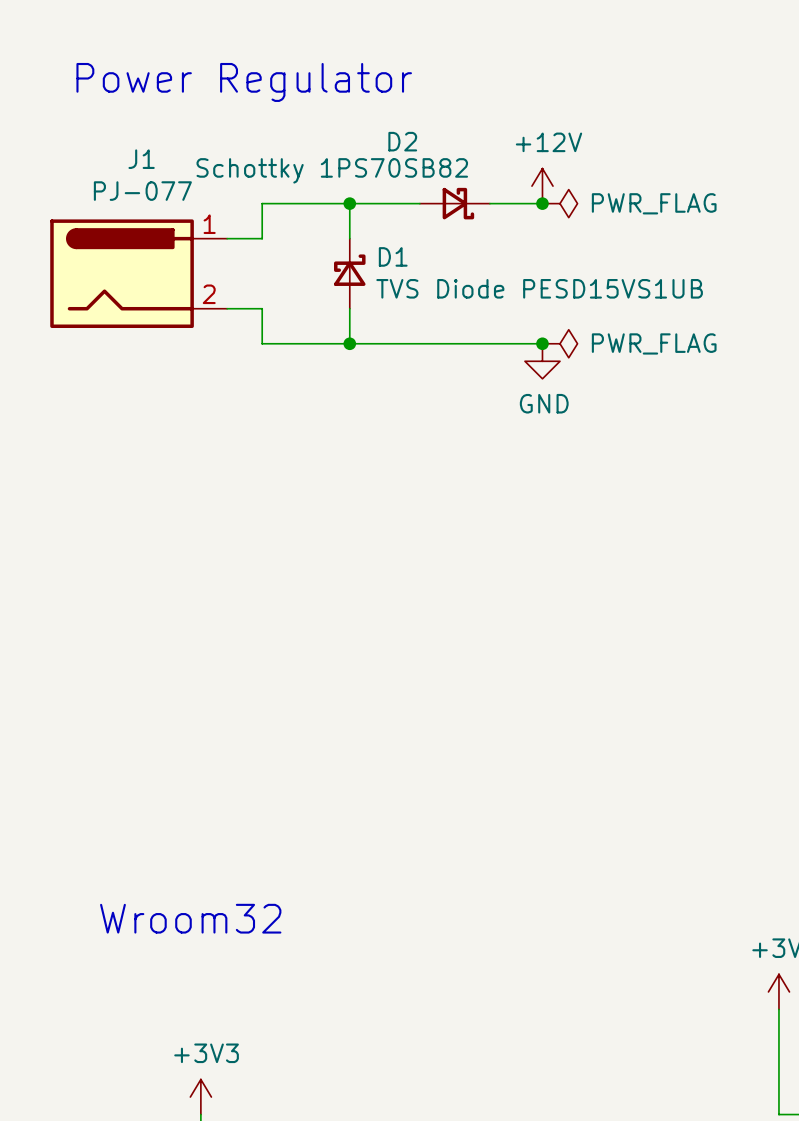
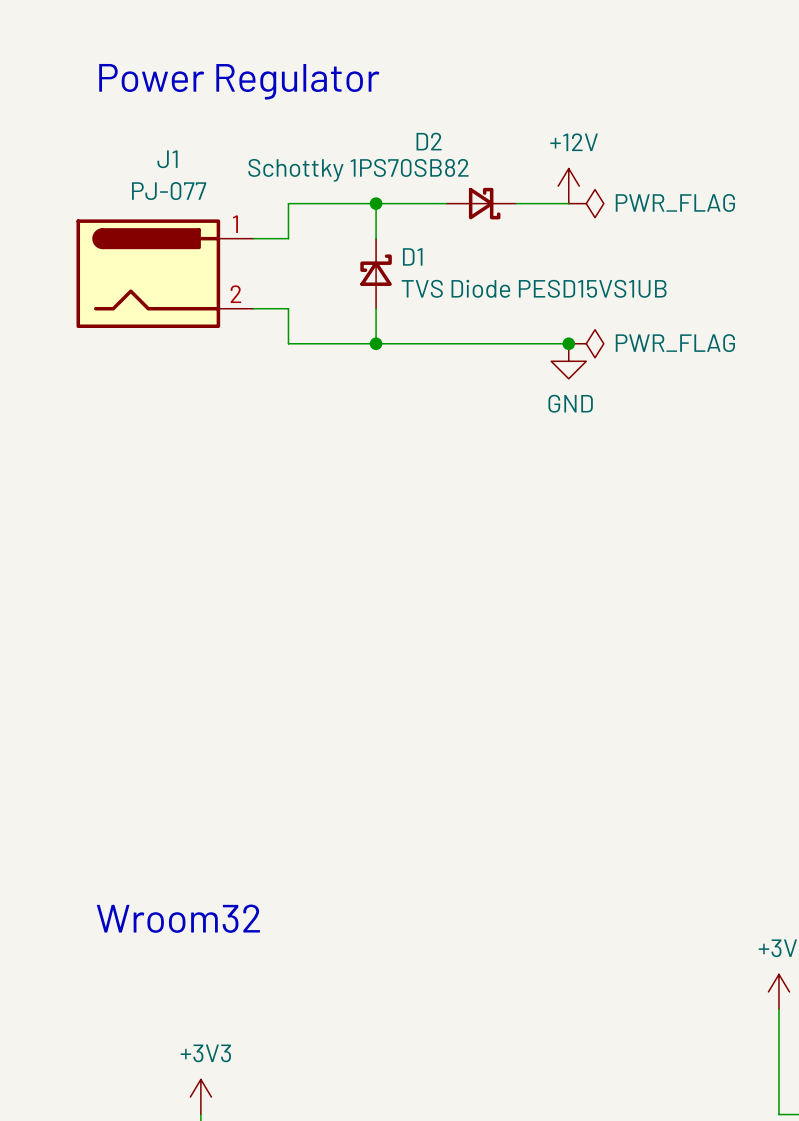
text position: Power Regulator (244, 82) -> Power Regulator (239, 81)
power symbol position: +12V (542, 186) -> +12V (568, 186)
wire: (288, 203) (262, 203) (262, 238) -> (288, 203) (288, 238) (262, 238)
wire: (349, 203) (349, 238) -> (376, 203) (376, 238)
junction position: (349, 203) -> (376, 203)
D2 position: (454, 203) -> (481, 203)
junction: (542, 203) -> none
power symbol position: PWR_FLAG (560, 203) -> PWR_FLAG (586, 203)
J1 position: (138, 273) -> (164, 273)
D1 position: (349, 273) -> (376, 273)
wire: (262, 308) (262, 343) (288, 343) -> (262, 308) (288, 308) (288, 343)
wire: (349, 308) (349, 343) -> (376, 308) (376, 343)
junction position: (349, 343) -> (376, 343)
junction position: (542, 343) -> (568, 343)
power symbol position: PWR_FLAG (560, 343) -> PWR_FLAG (586, 343)
power symbol position: GND (542, 361) -> GND (568, 361)

